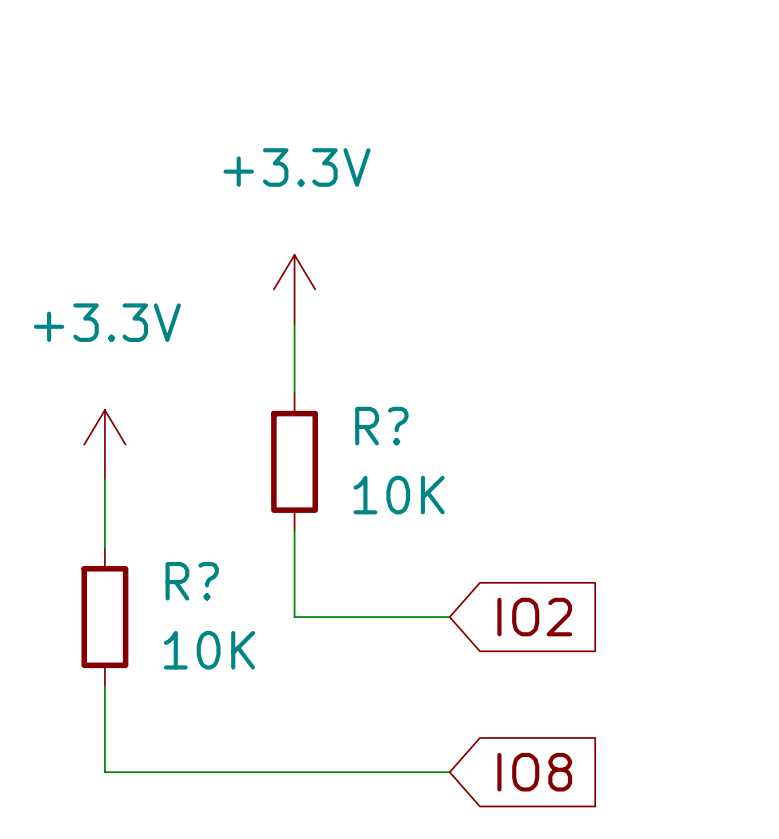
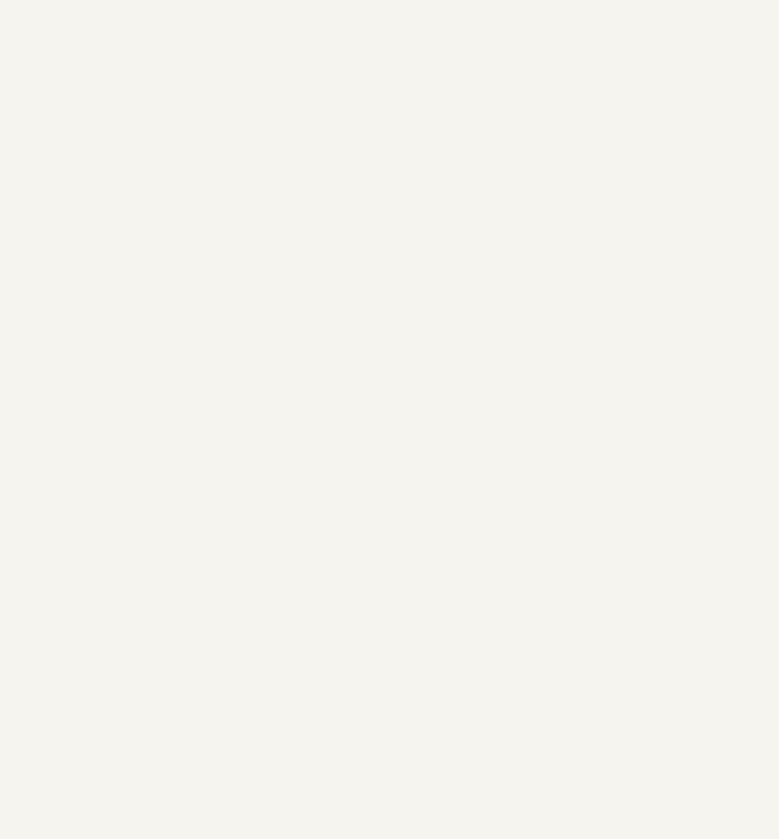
power symbol: +3.3V (294, 289) -> none
wire: (294, 323) (294, 392) -> none
power symbol: +3.3V (104, 444) -> none
R?: 10K (294, 461) -> none
wire: (104, 479) (104, 548) -> none
wire: (294, 530) (294, 617) (449, 617) -> none
R?: 10K (104, 617) -> none
global label: IO2 (534, 617) -> none
wire: (104, 686) (104, 772) (449, 772) -> none
global label: IO8 (534, 772) -> none

